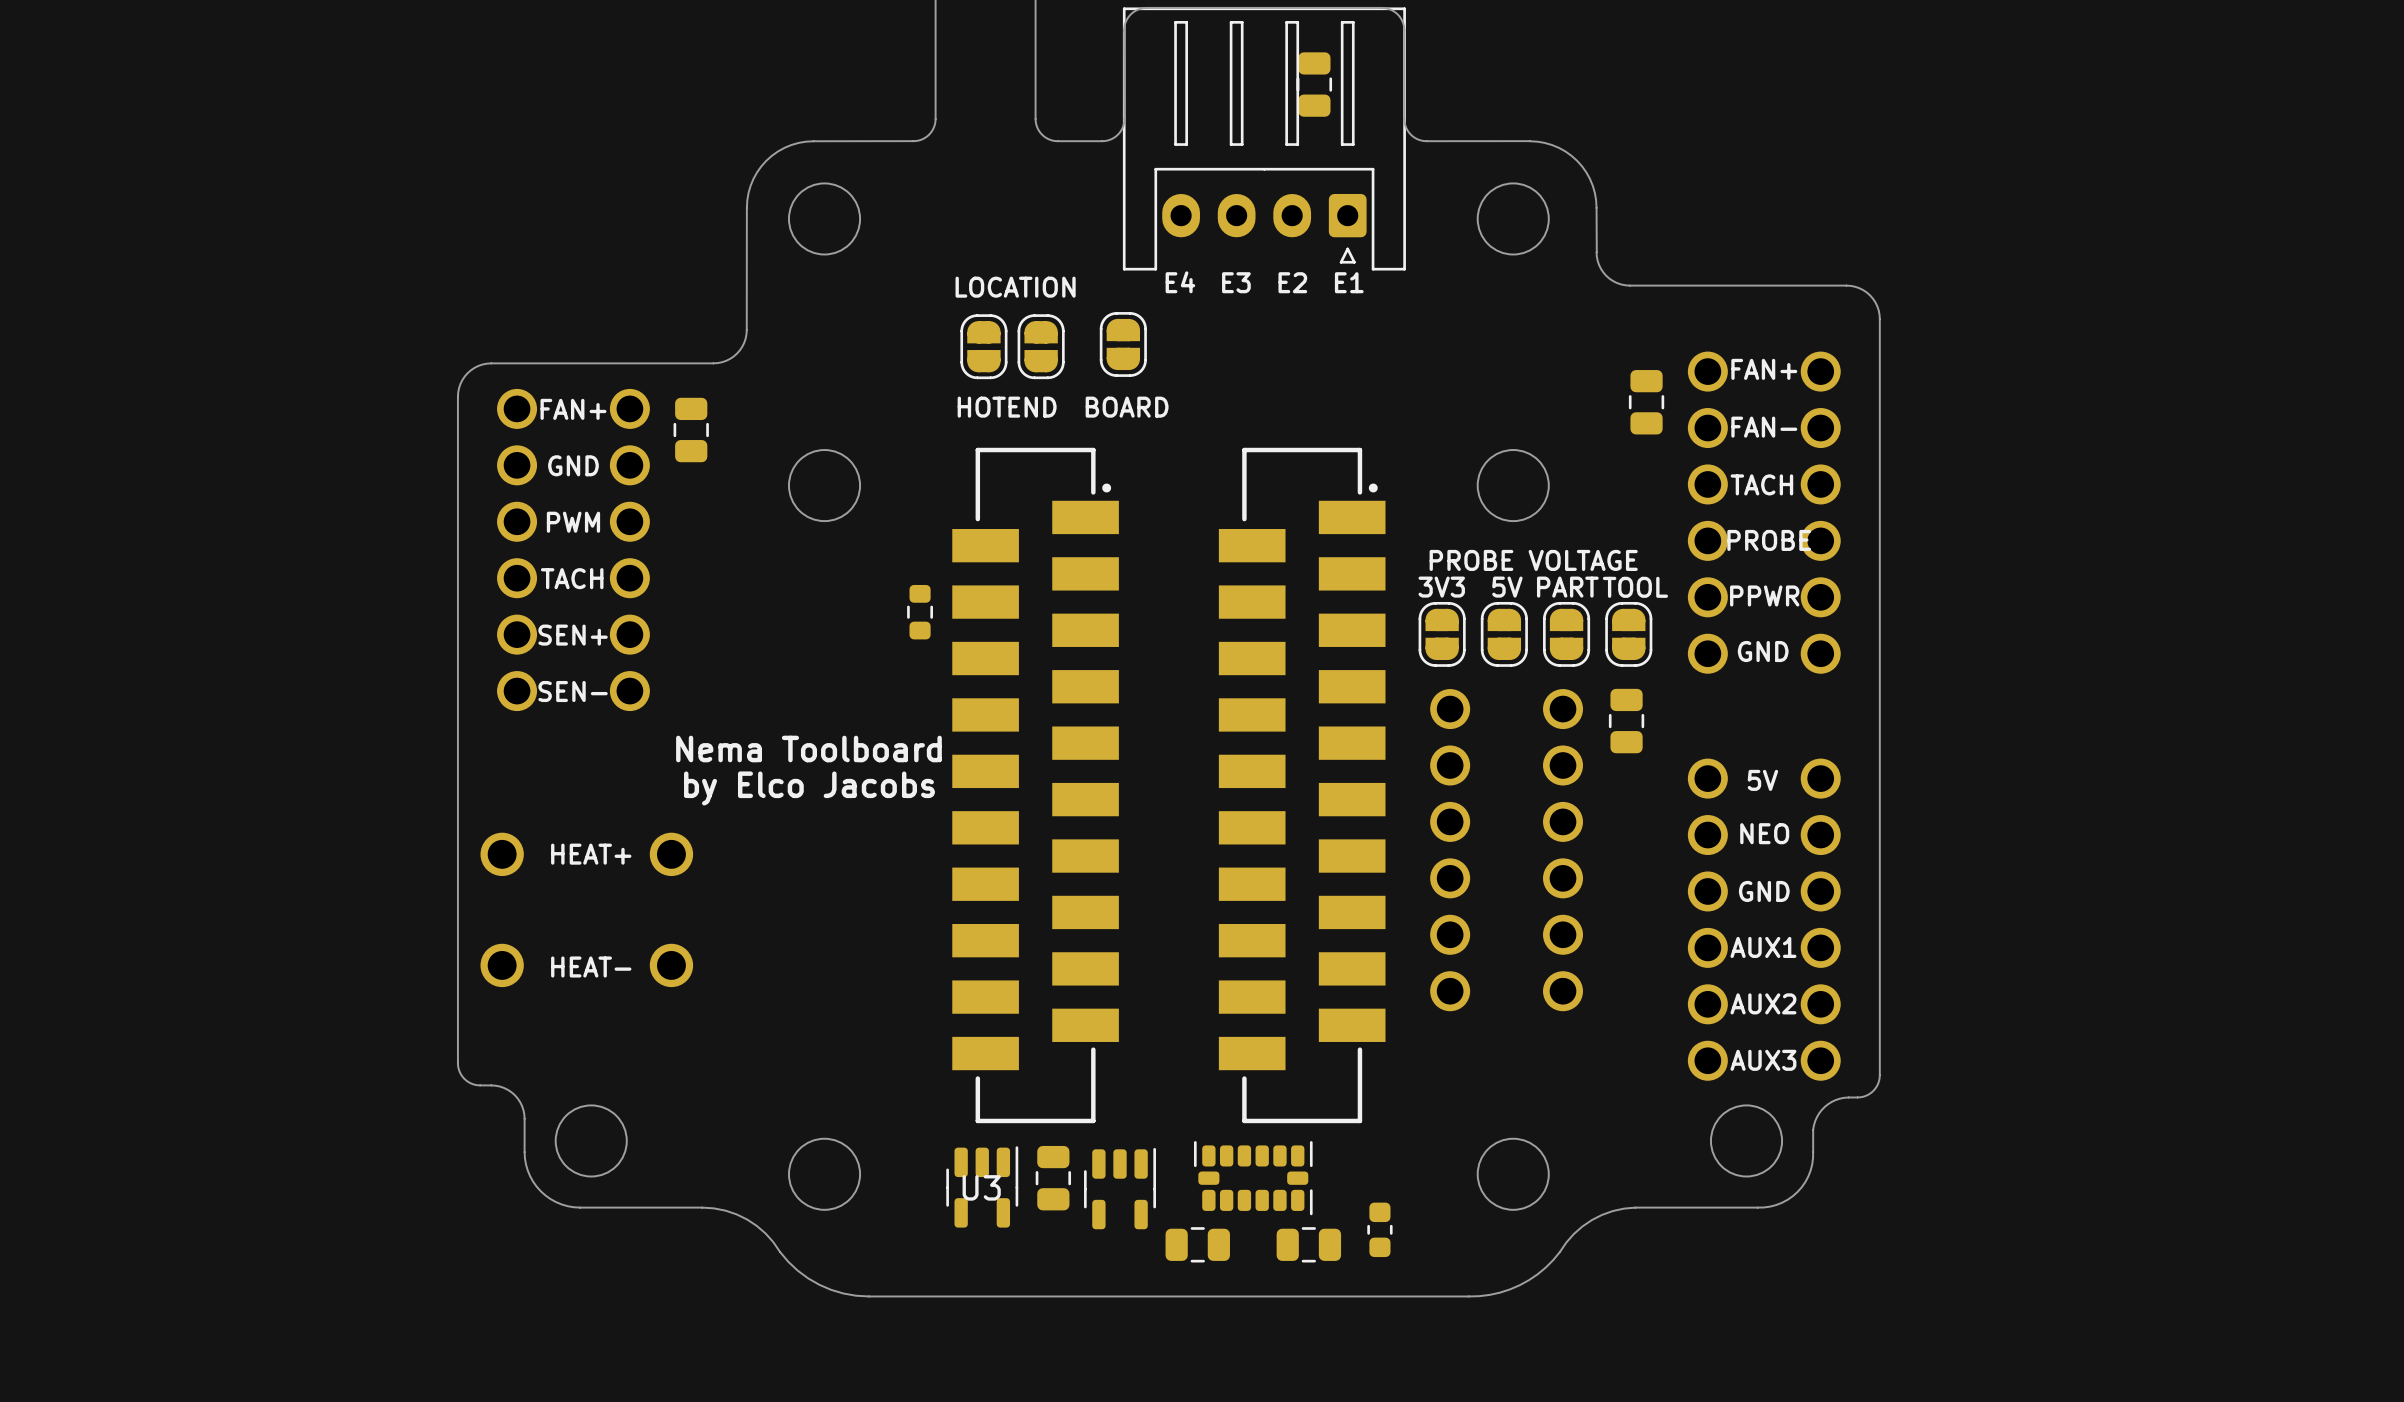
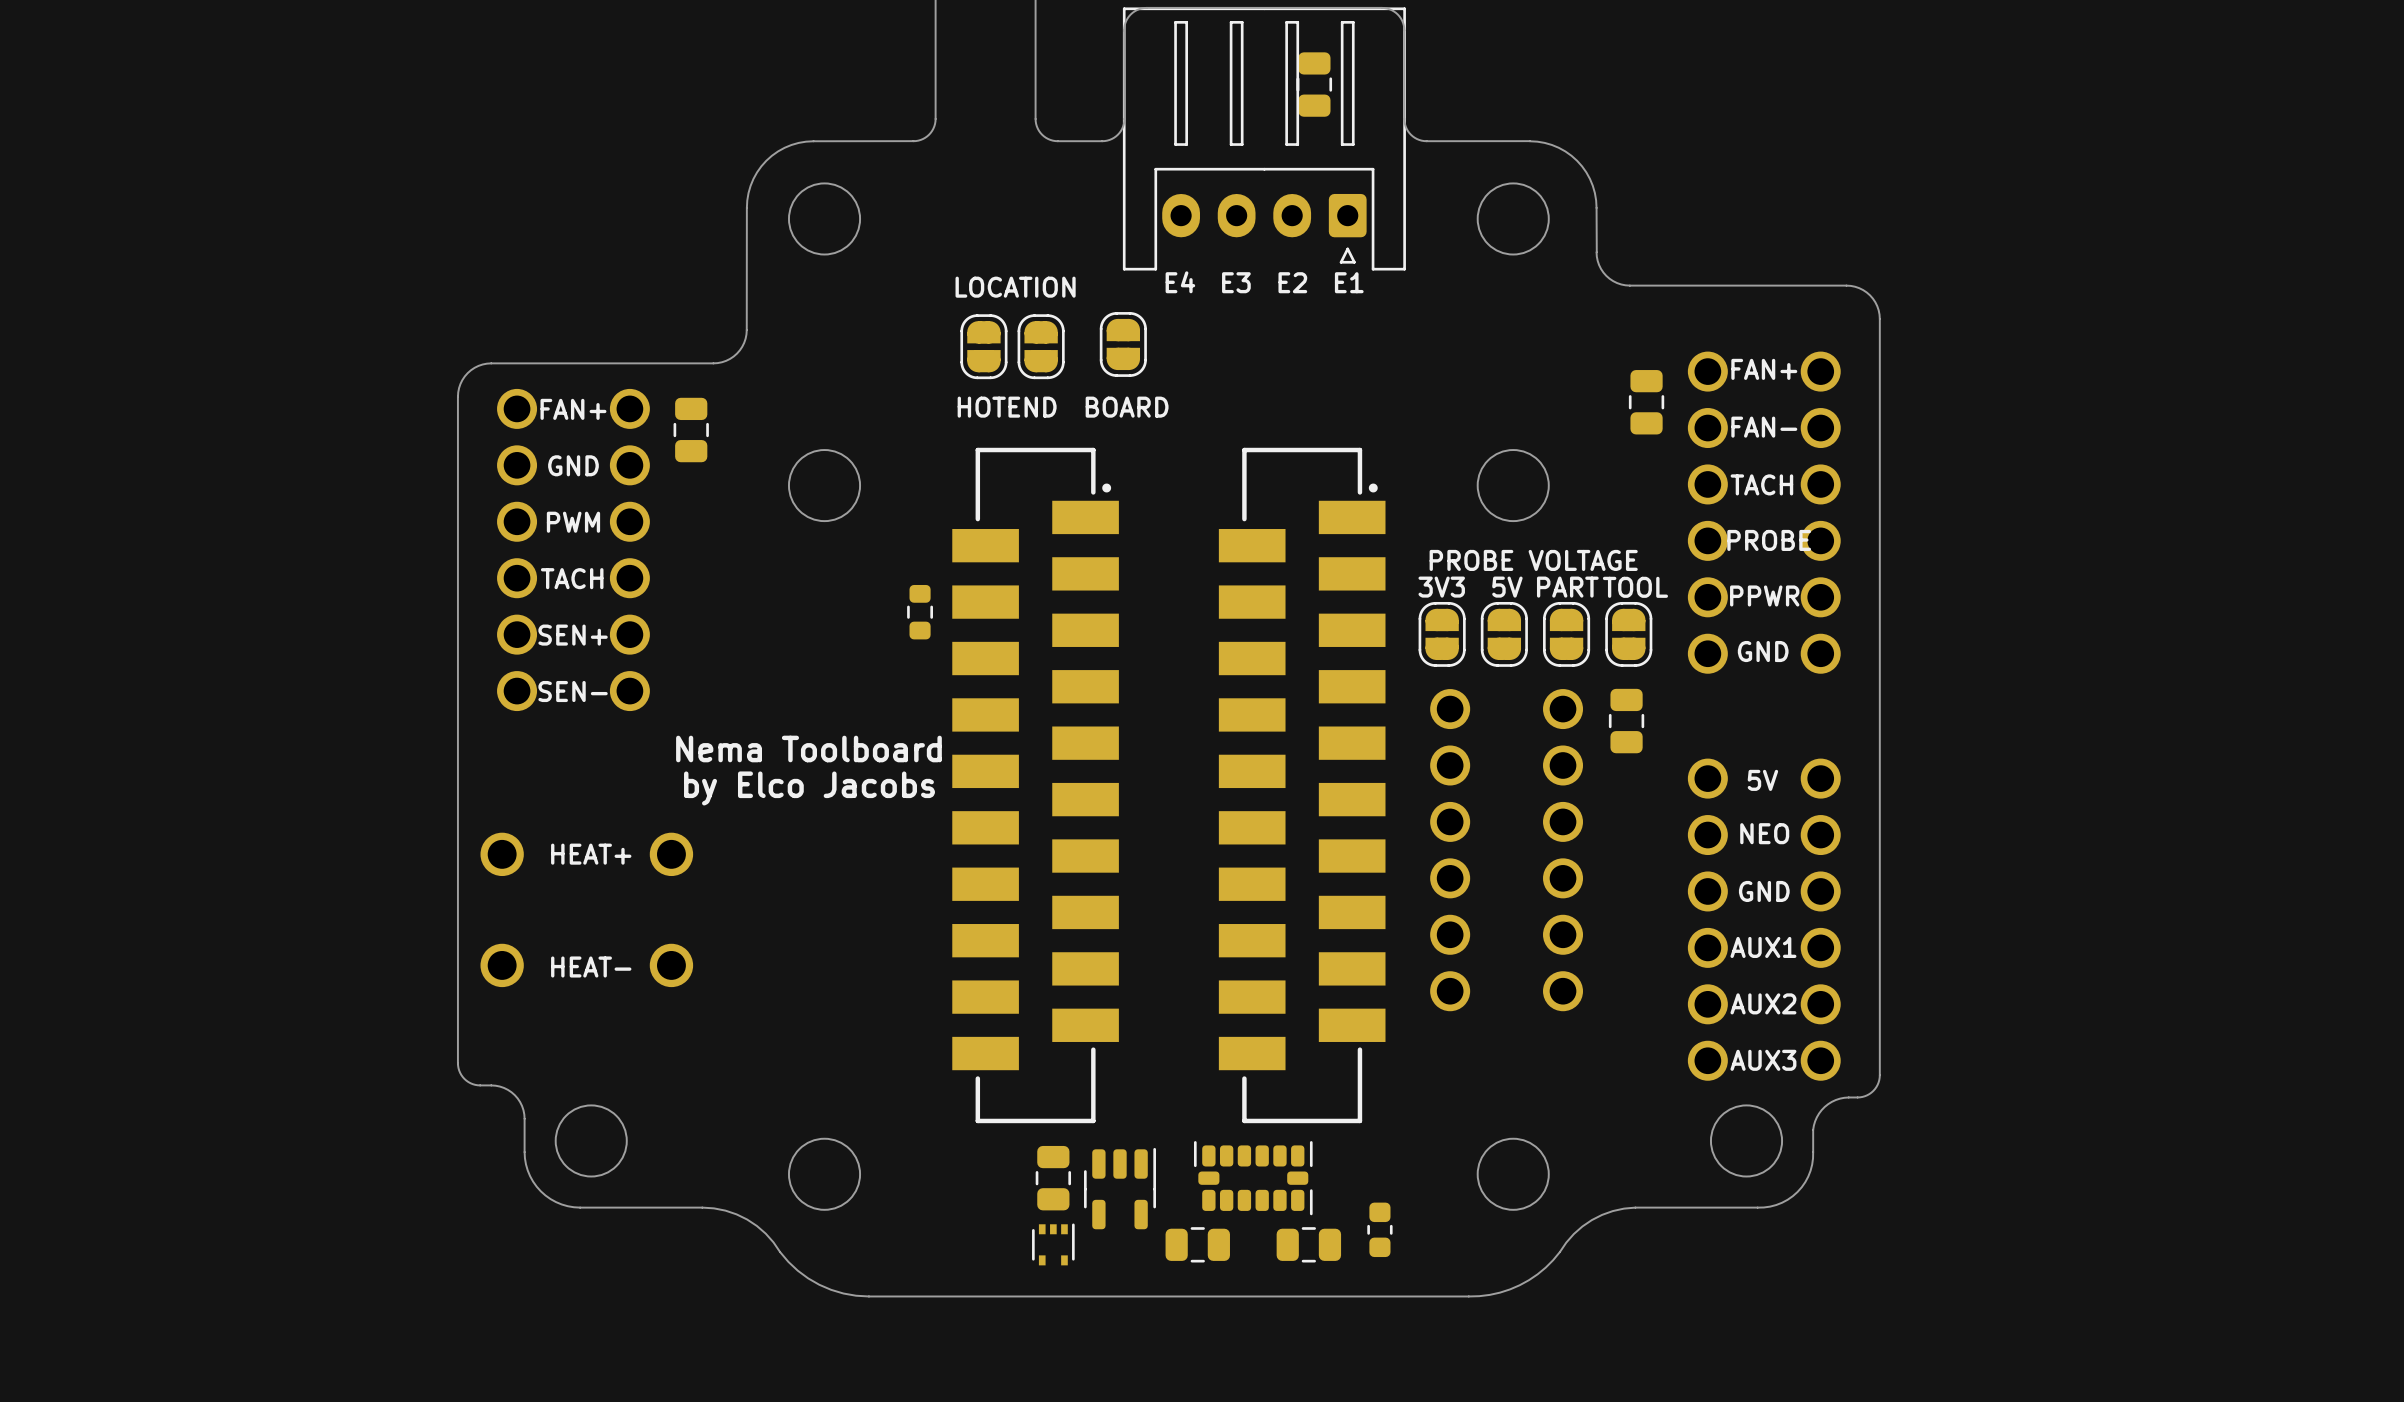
U3: (982, 1186) -> none
part: none -> (1053, 1244)

